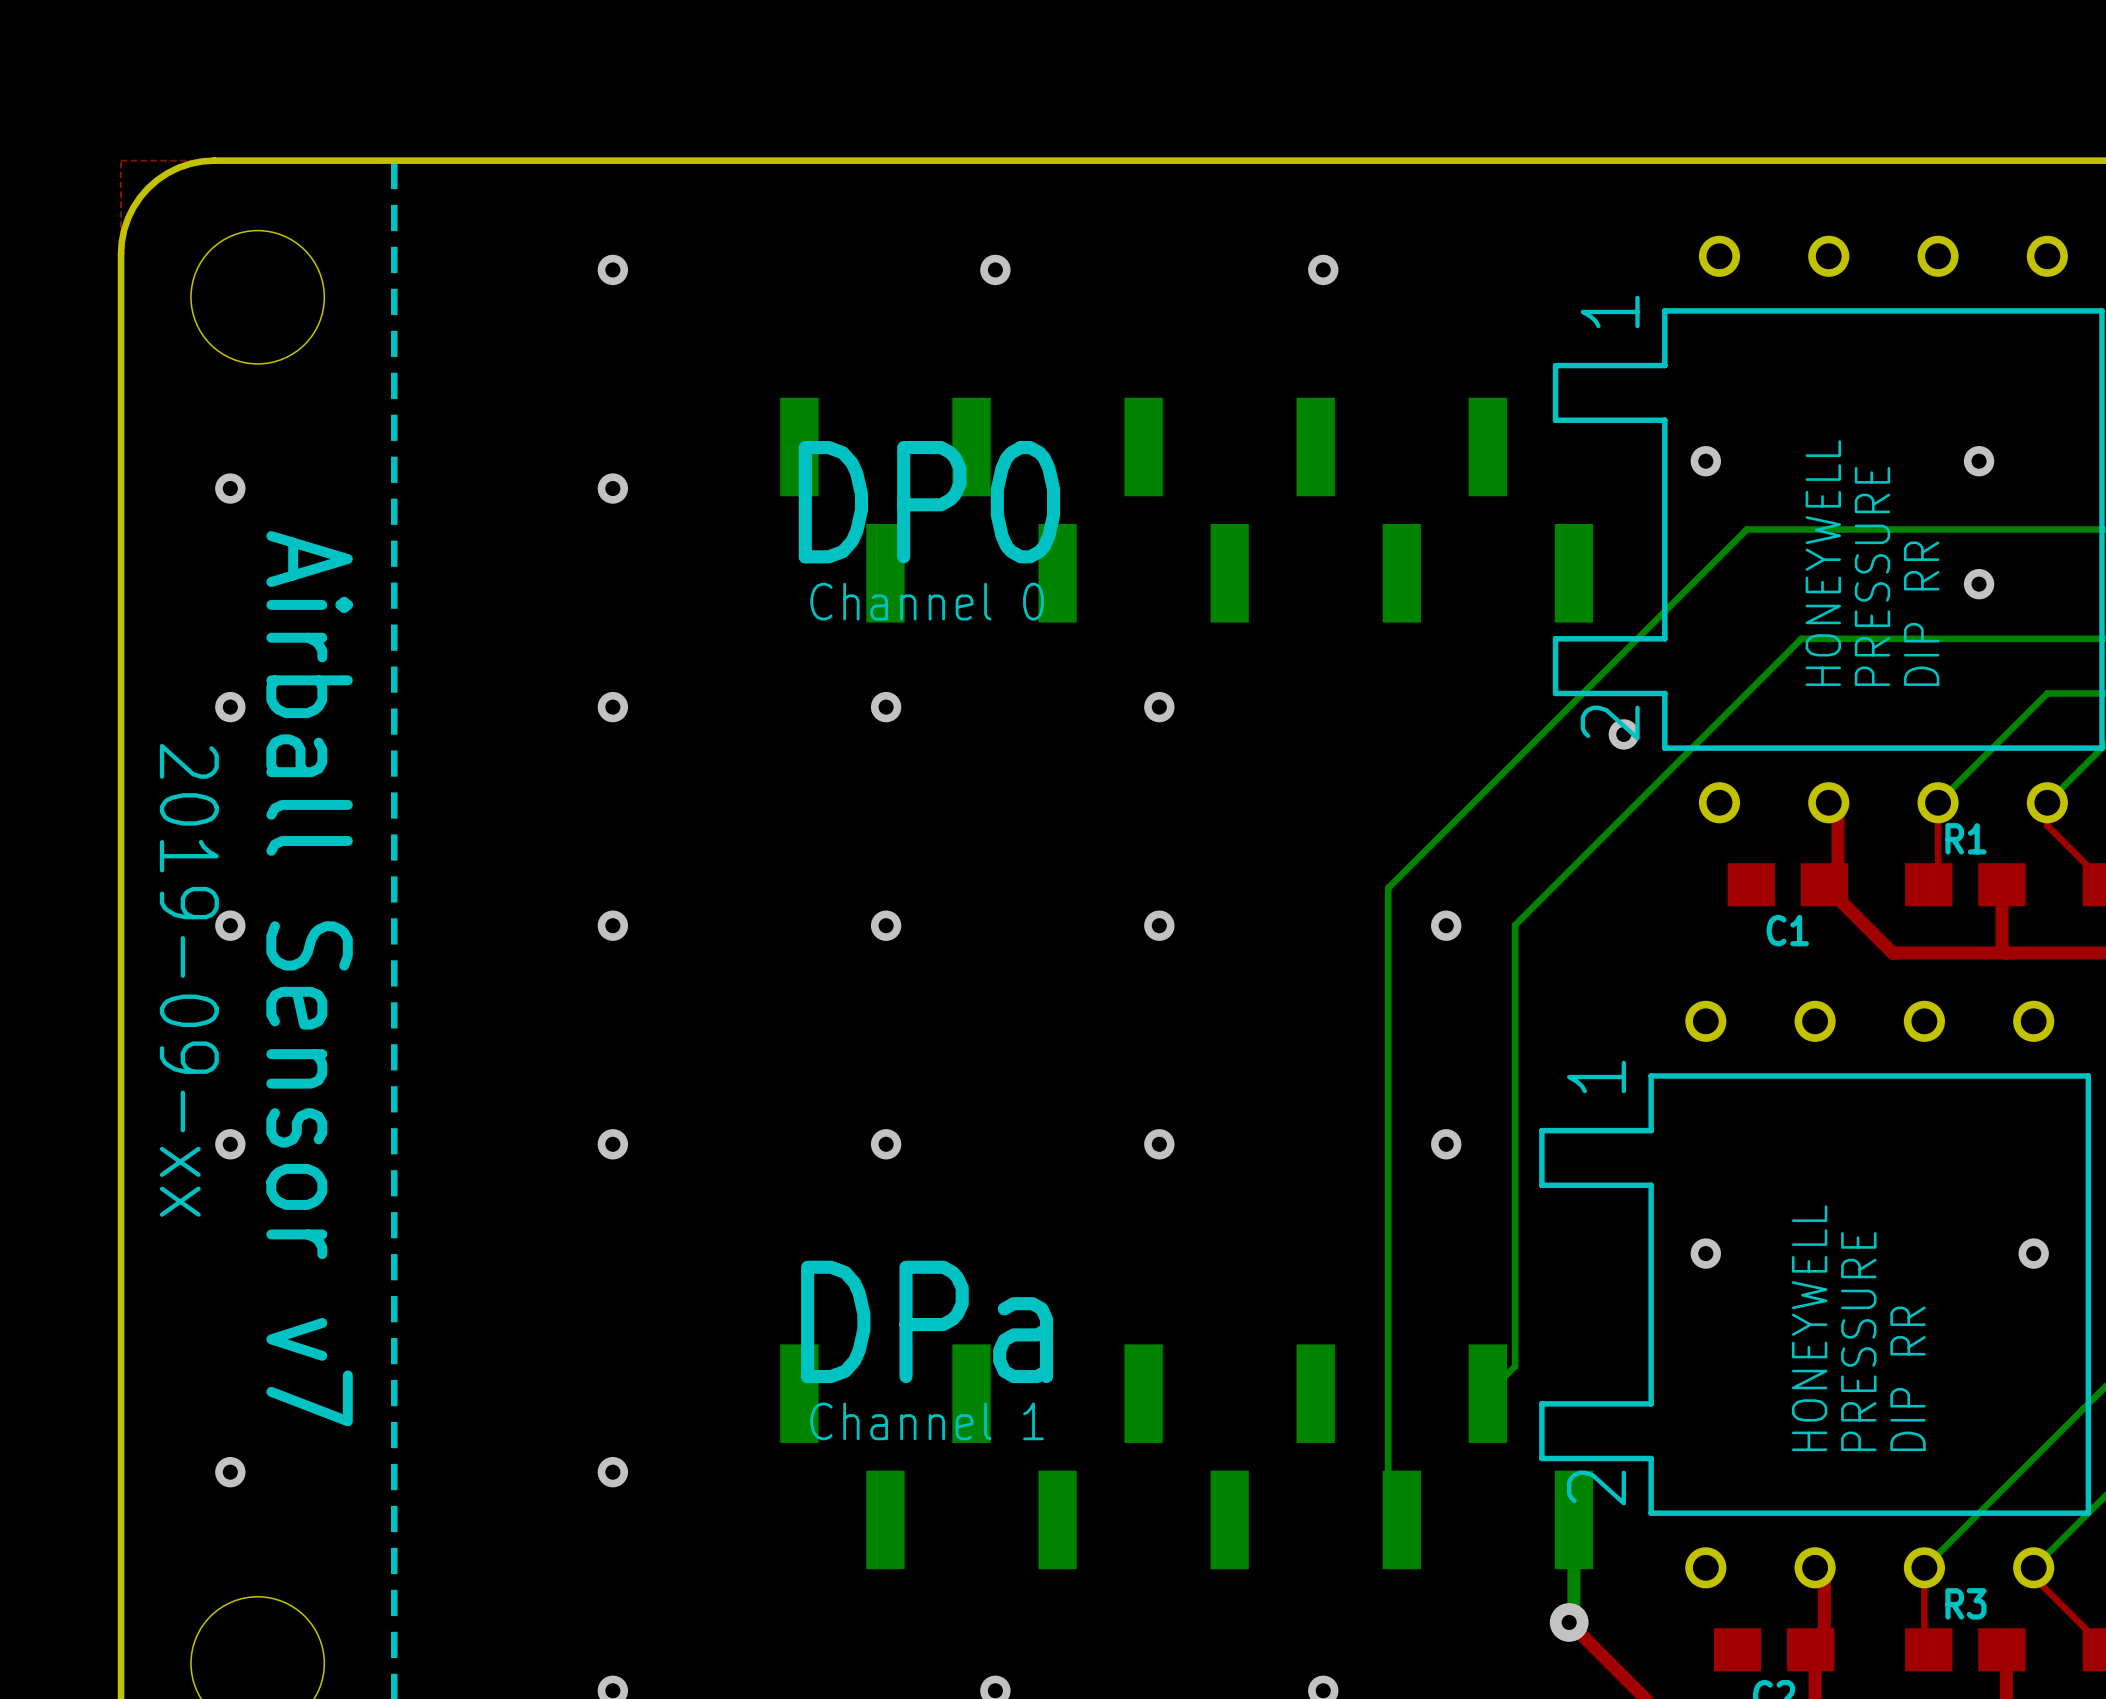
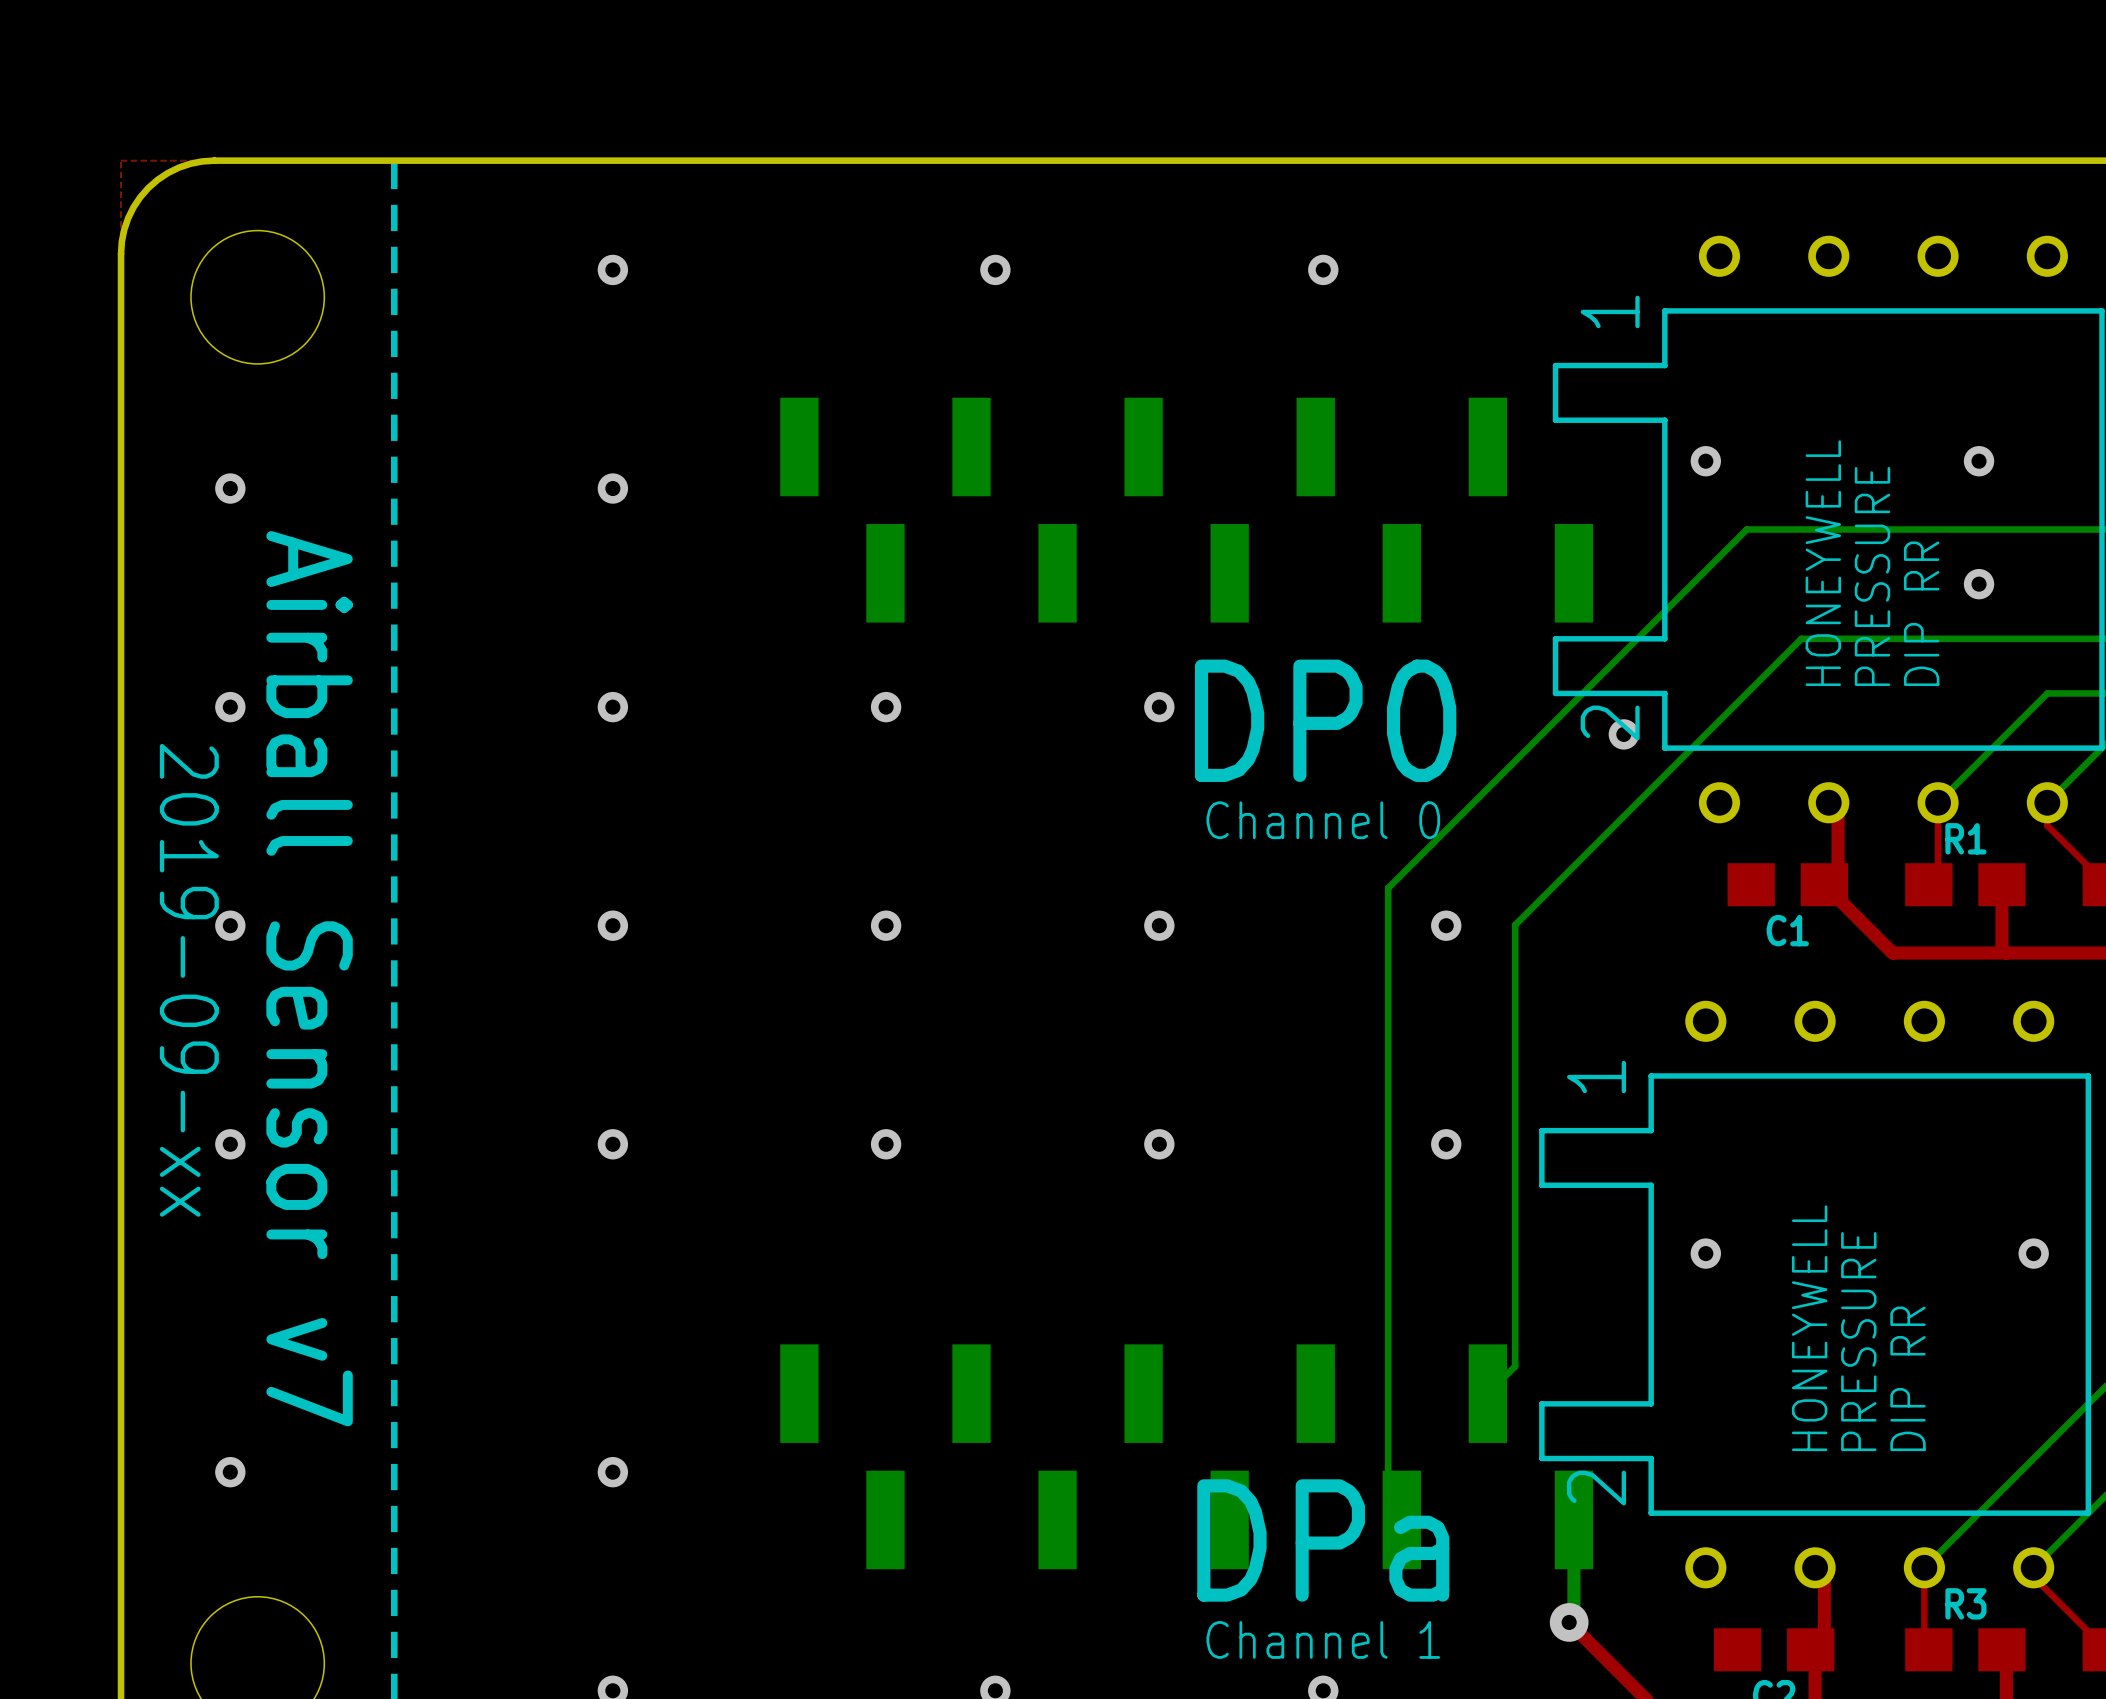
text position: DP0 (929, 502) -> DP0 (1325, 720)
text position: Channel 0 (927, 601) -> Channel 0 (1323, 820)
text position: DPa (927, 1321) -> DPa (1323, 1540)
text position: Channel 1 (927, 1421) -> Channel 1 (1323, 1639)

